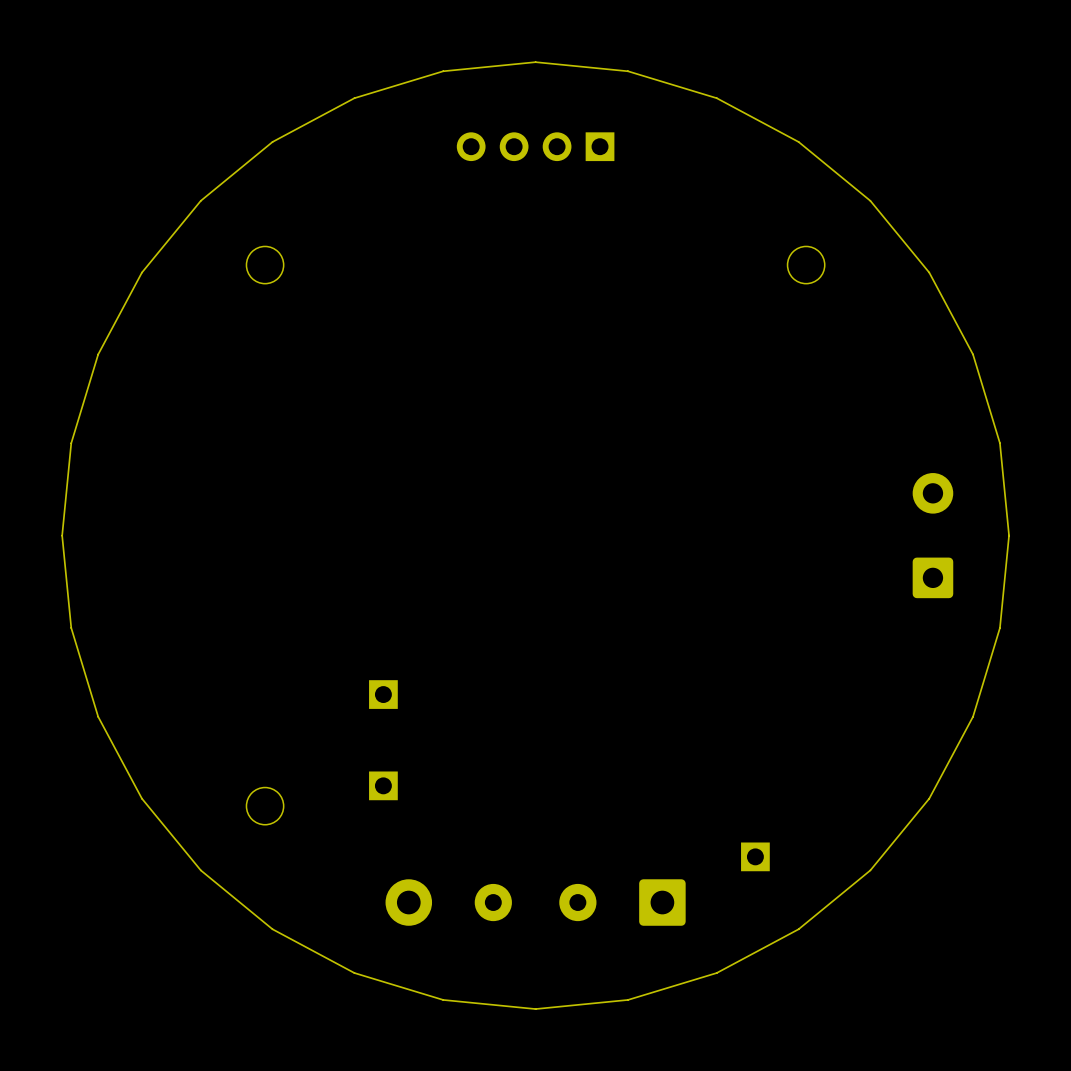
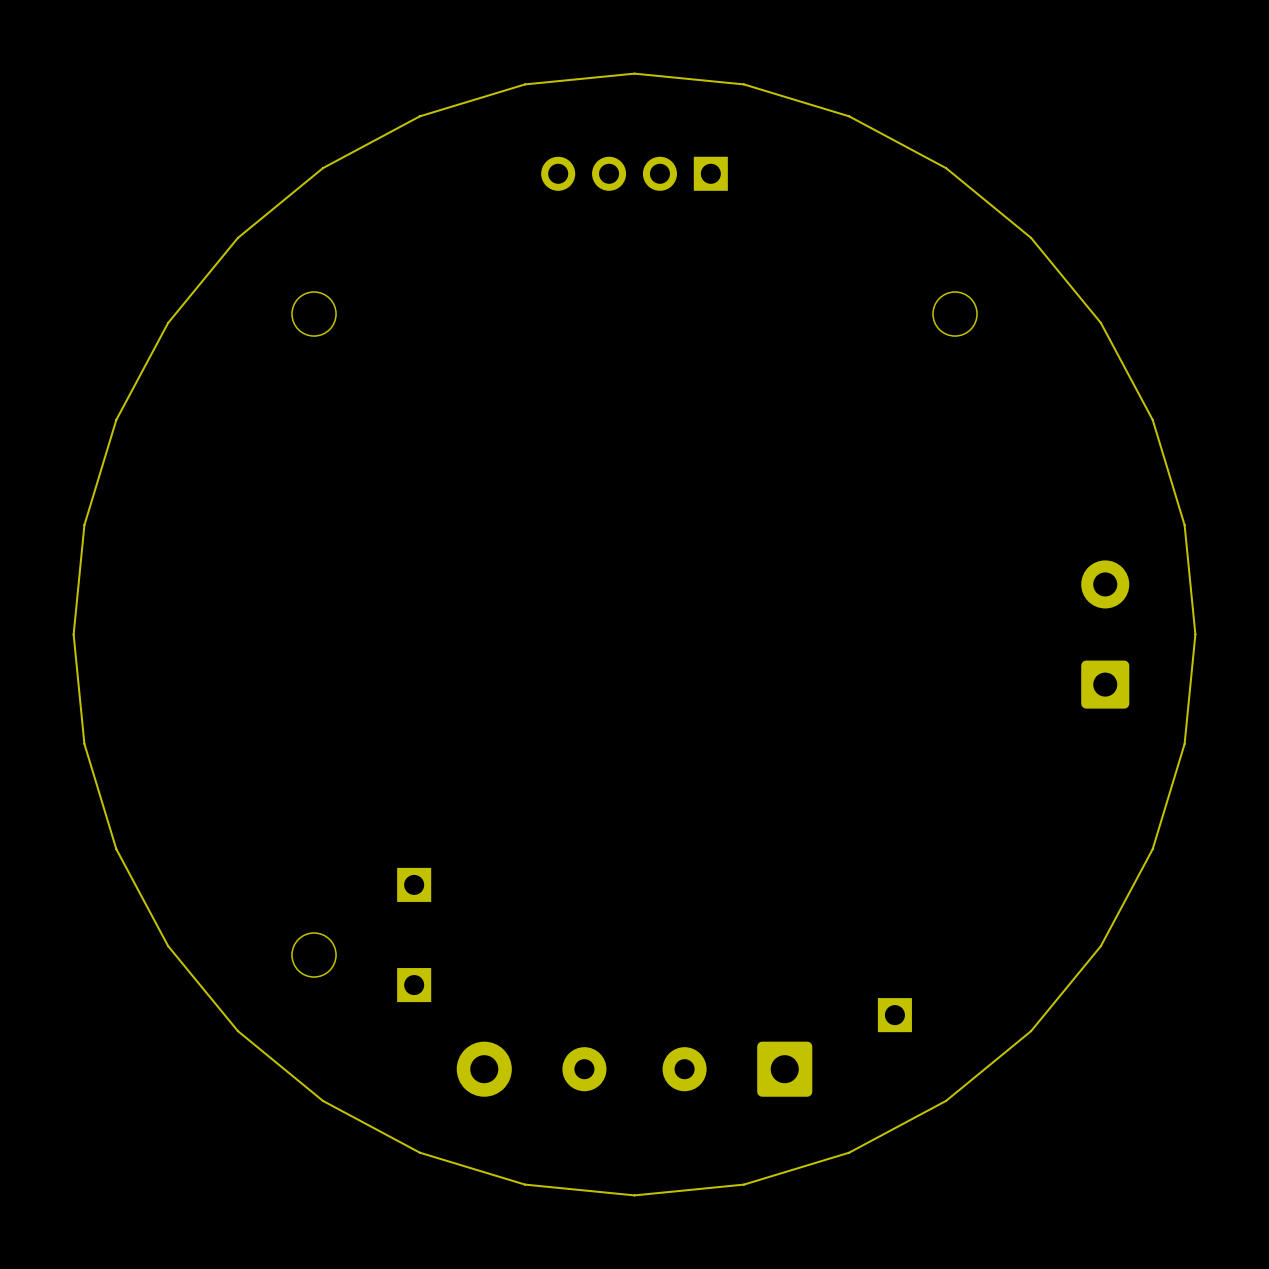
part: (383, 694) -> none
part: none -> (414, 884)
part: (383, 785) -> none
part: none -> (414, 985)

